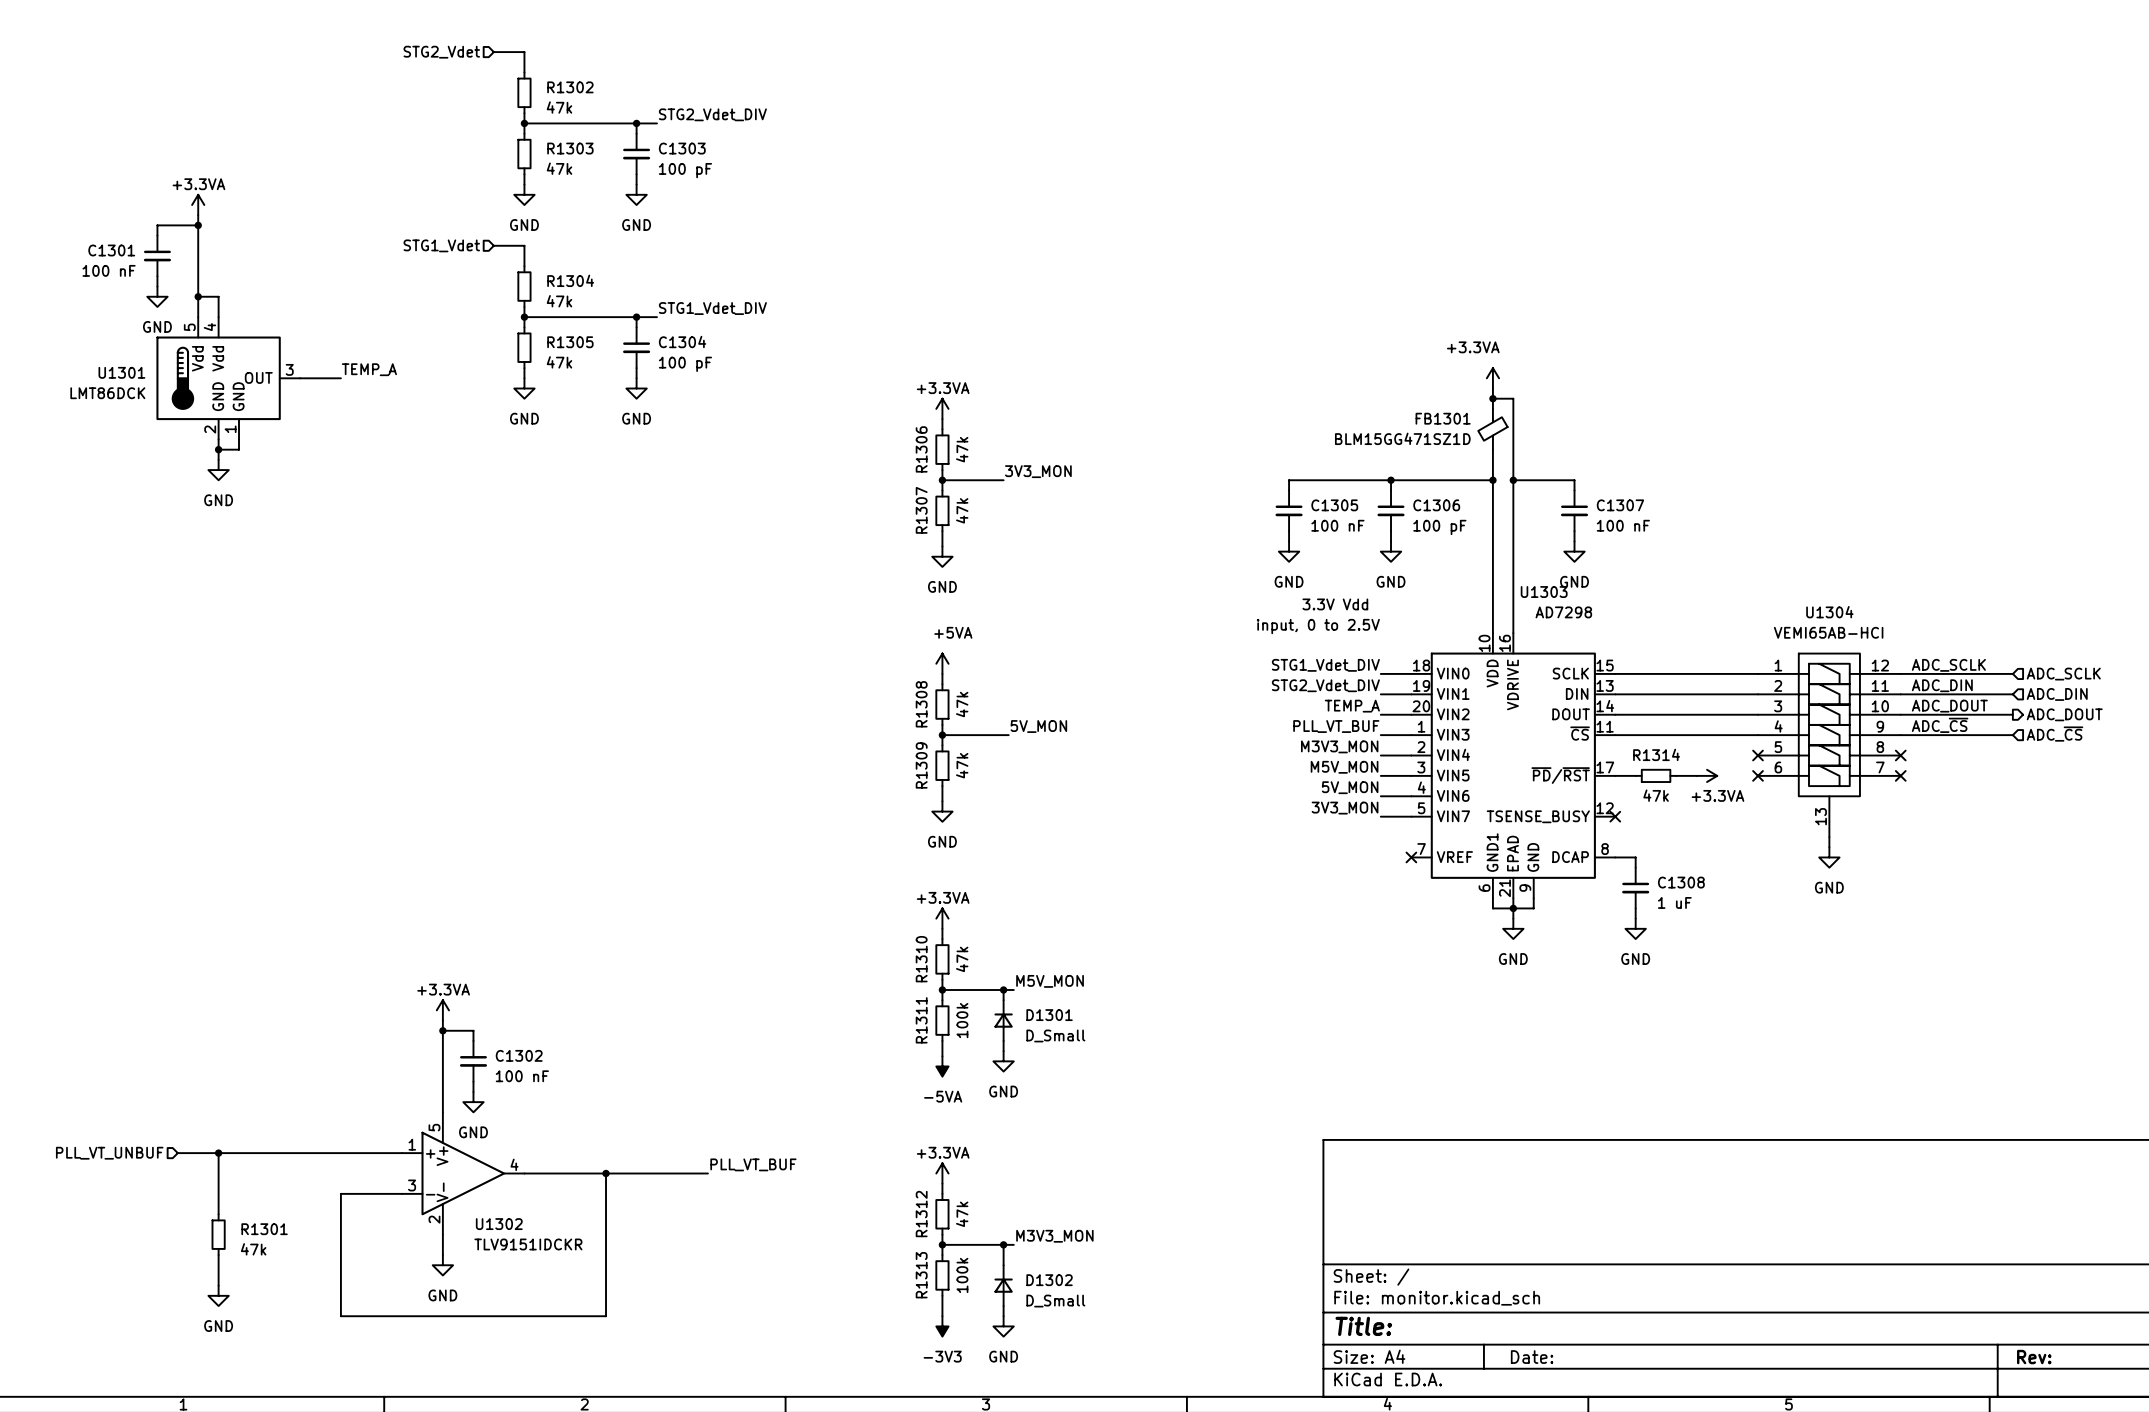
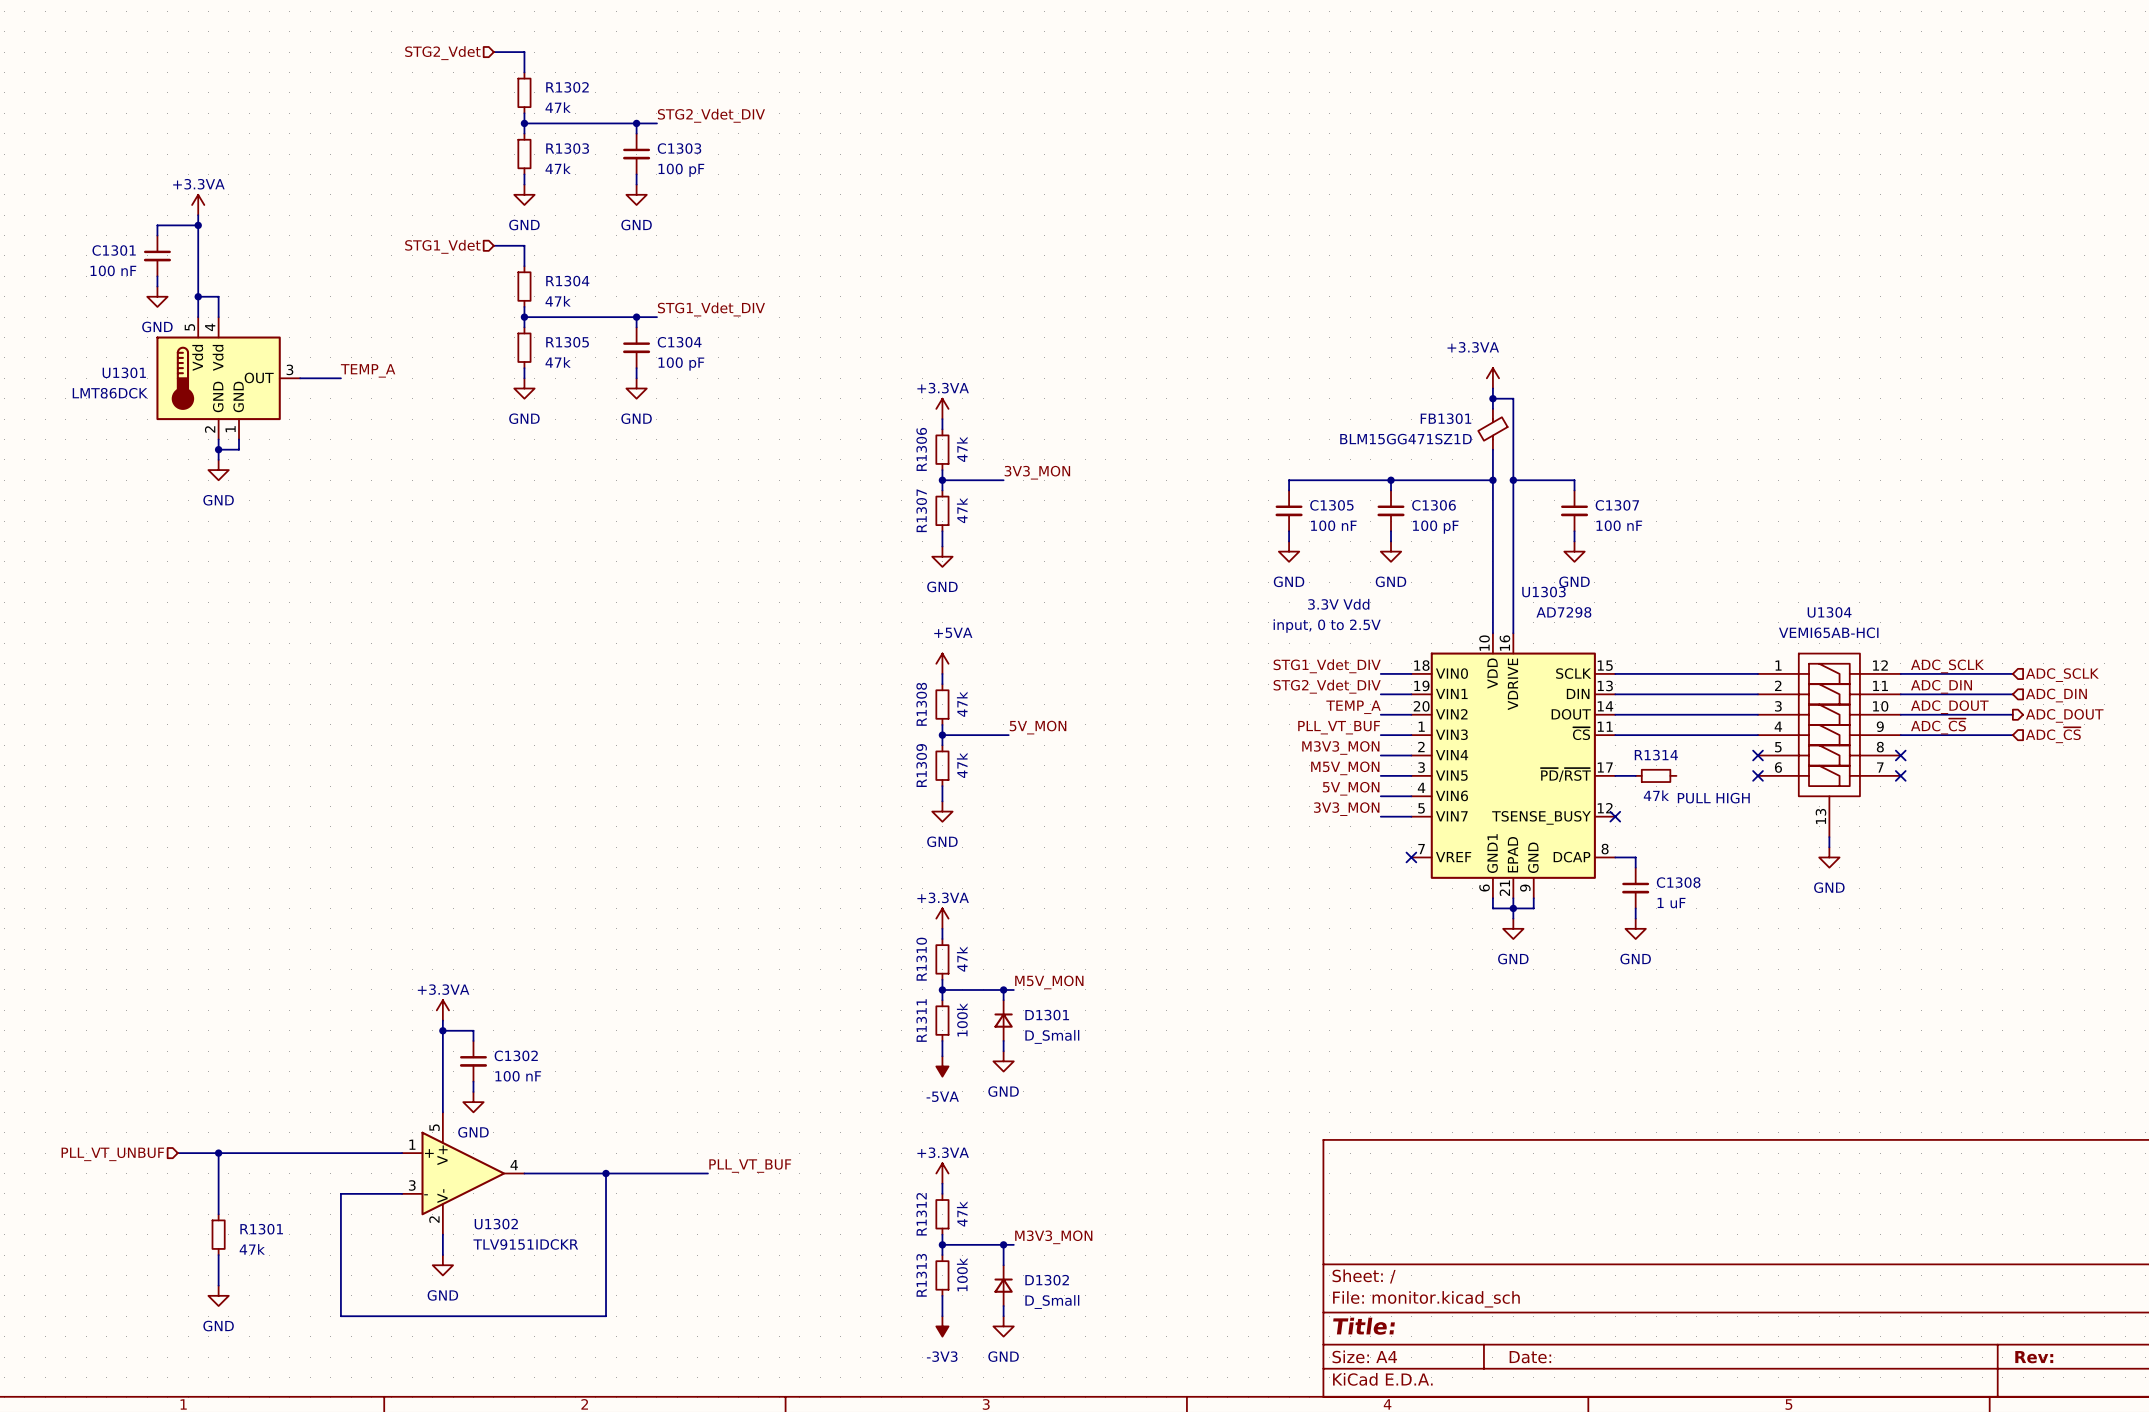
wire: (1676, 775) (1696, 775) -> none
power symbol: +3.3VA (1707, 775) -> none
text: none -> PULL HIGH (1713, 798)

